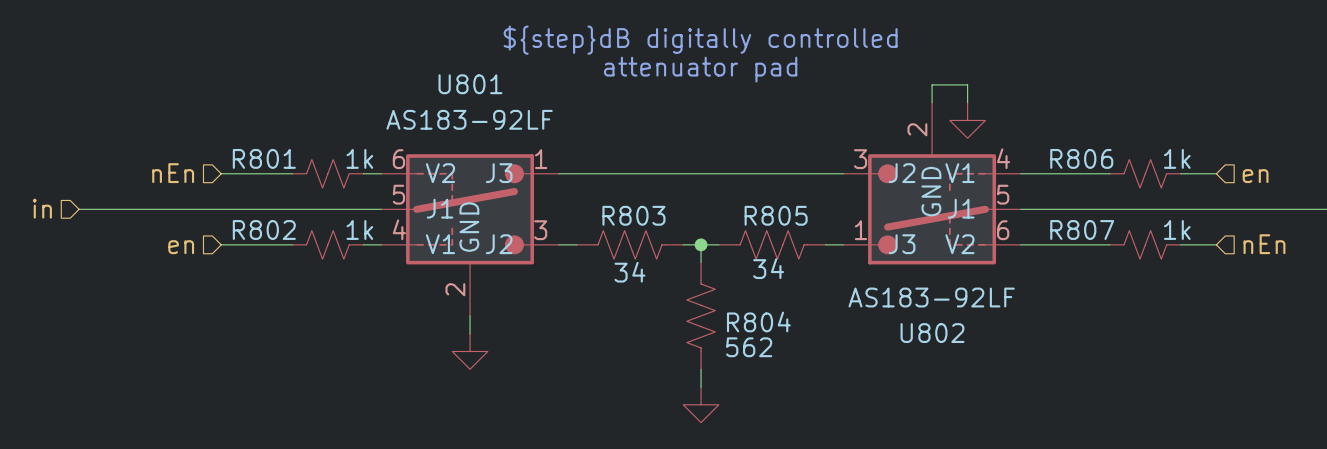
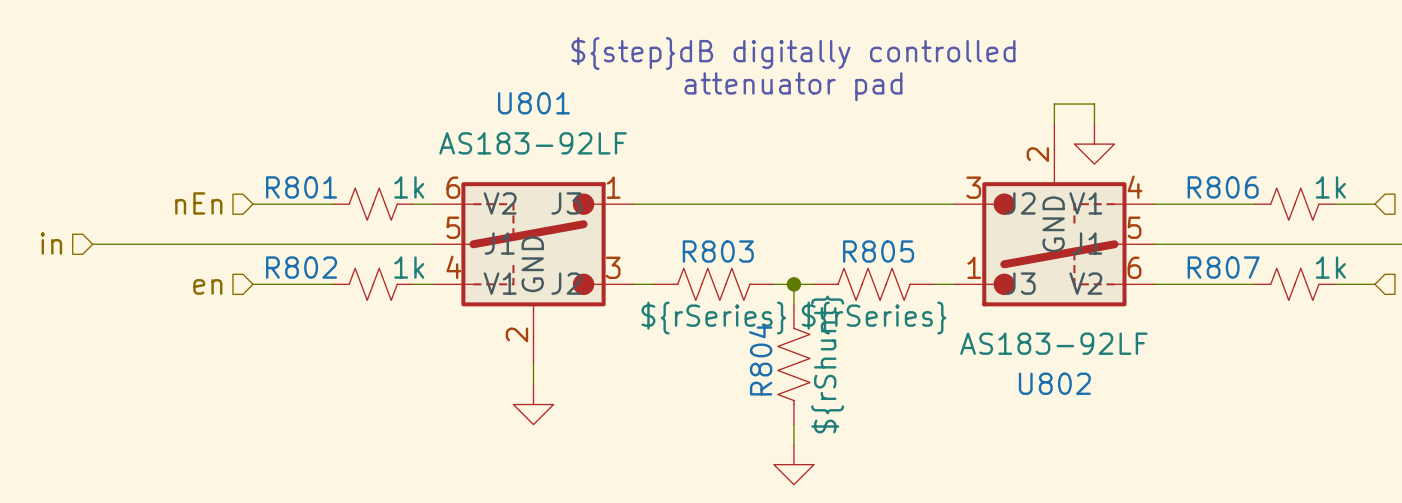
R805 value: 34 (768, 268) -> ${rSeries} (874, 318)
R803 value: 34 (629, 272) -> ${rSeries} (713, 318)
R804 name rotation: 0° (758, 321) -> 90° counterclockwise (760, 359)
R804 name position: R804 (758, 321) -> R804 (760, 359)
R804 value: 562 (749, 347) -> ${rShunt} (827, 364)

